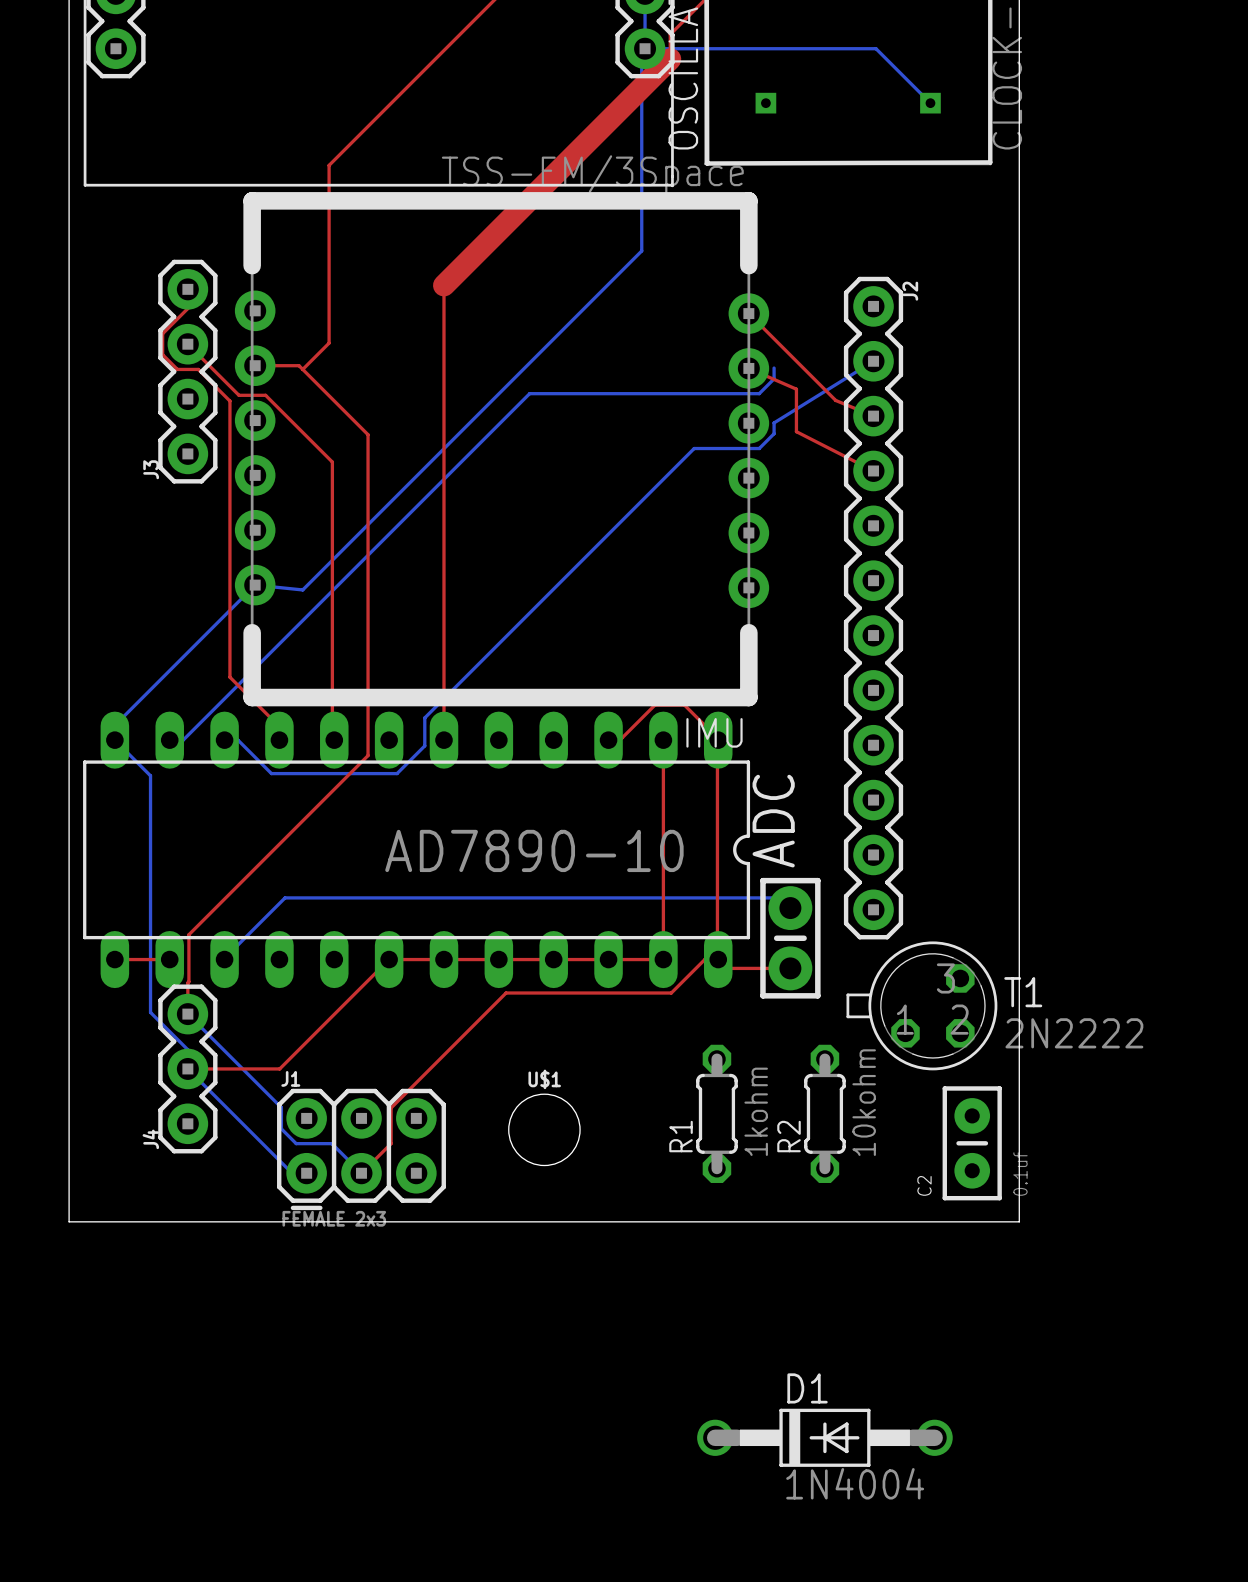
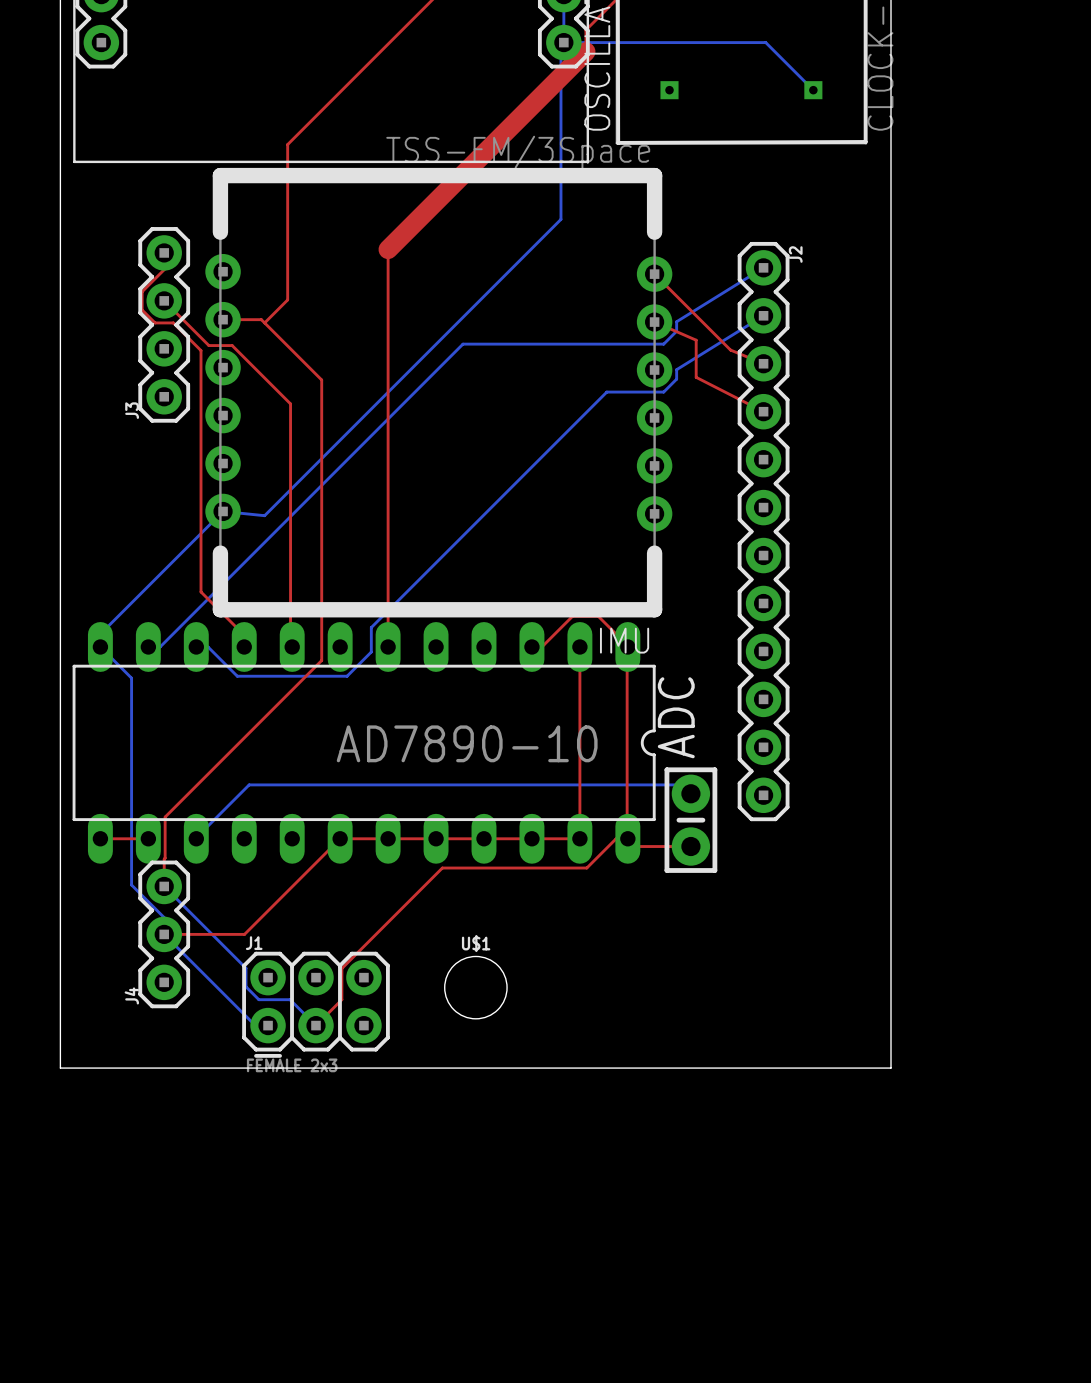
bottom track: none -> (763, 267) (676, 321)
T1: 2N2222 (921, 1005) -> none
R1: 1kohm (716, 1113) -> none
R2: 10kohm (824, 1113) -> none
C2: 0.1uf (972, 1143) -> none
D1: 1N4004 (824, 1437) -> none

